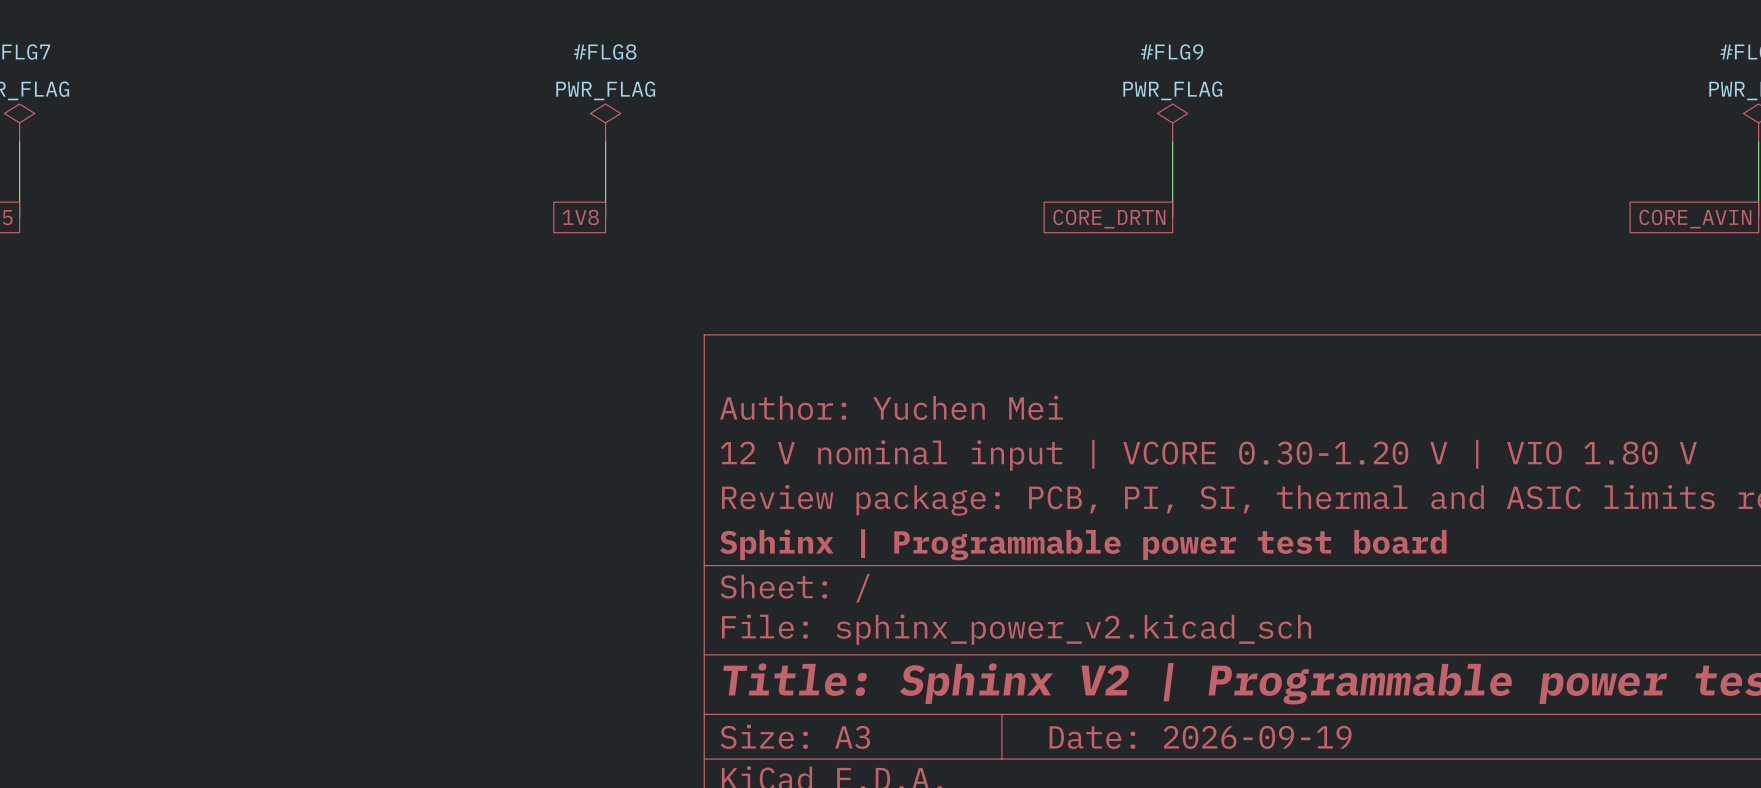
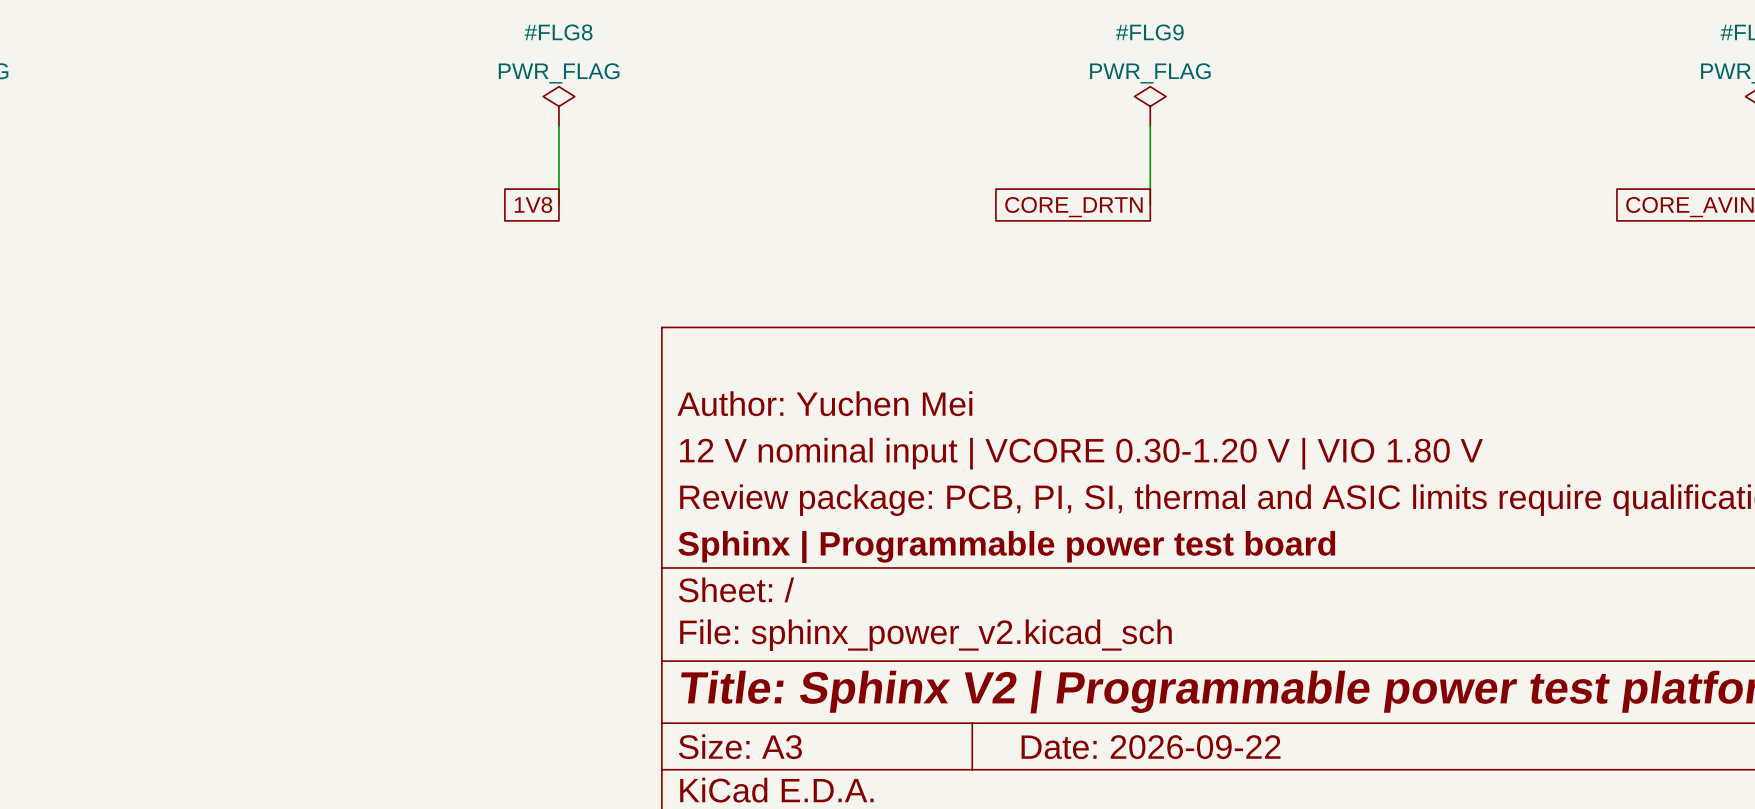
title block: Date: 2026-09-19 (1200, 737) -> Date: 2026-09-22 (1151, 747)

